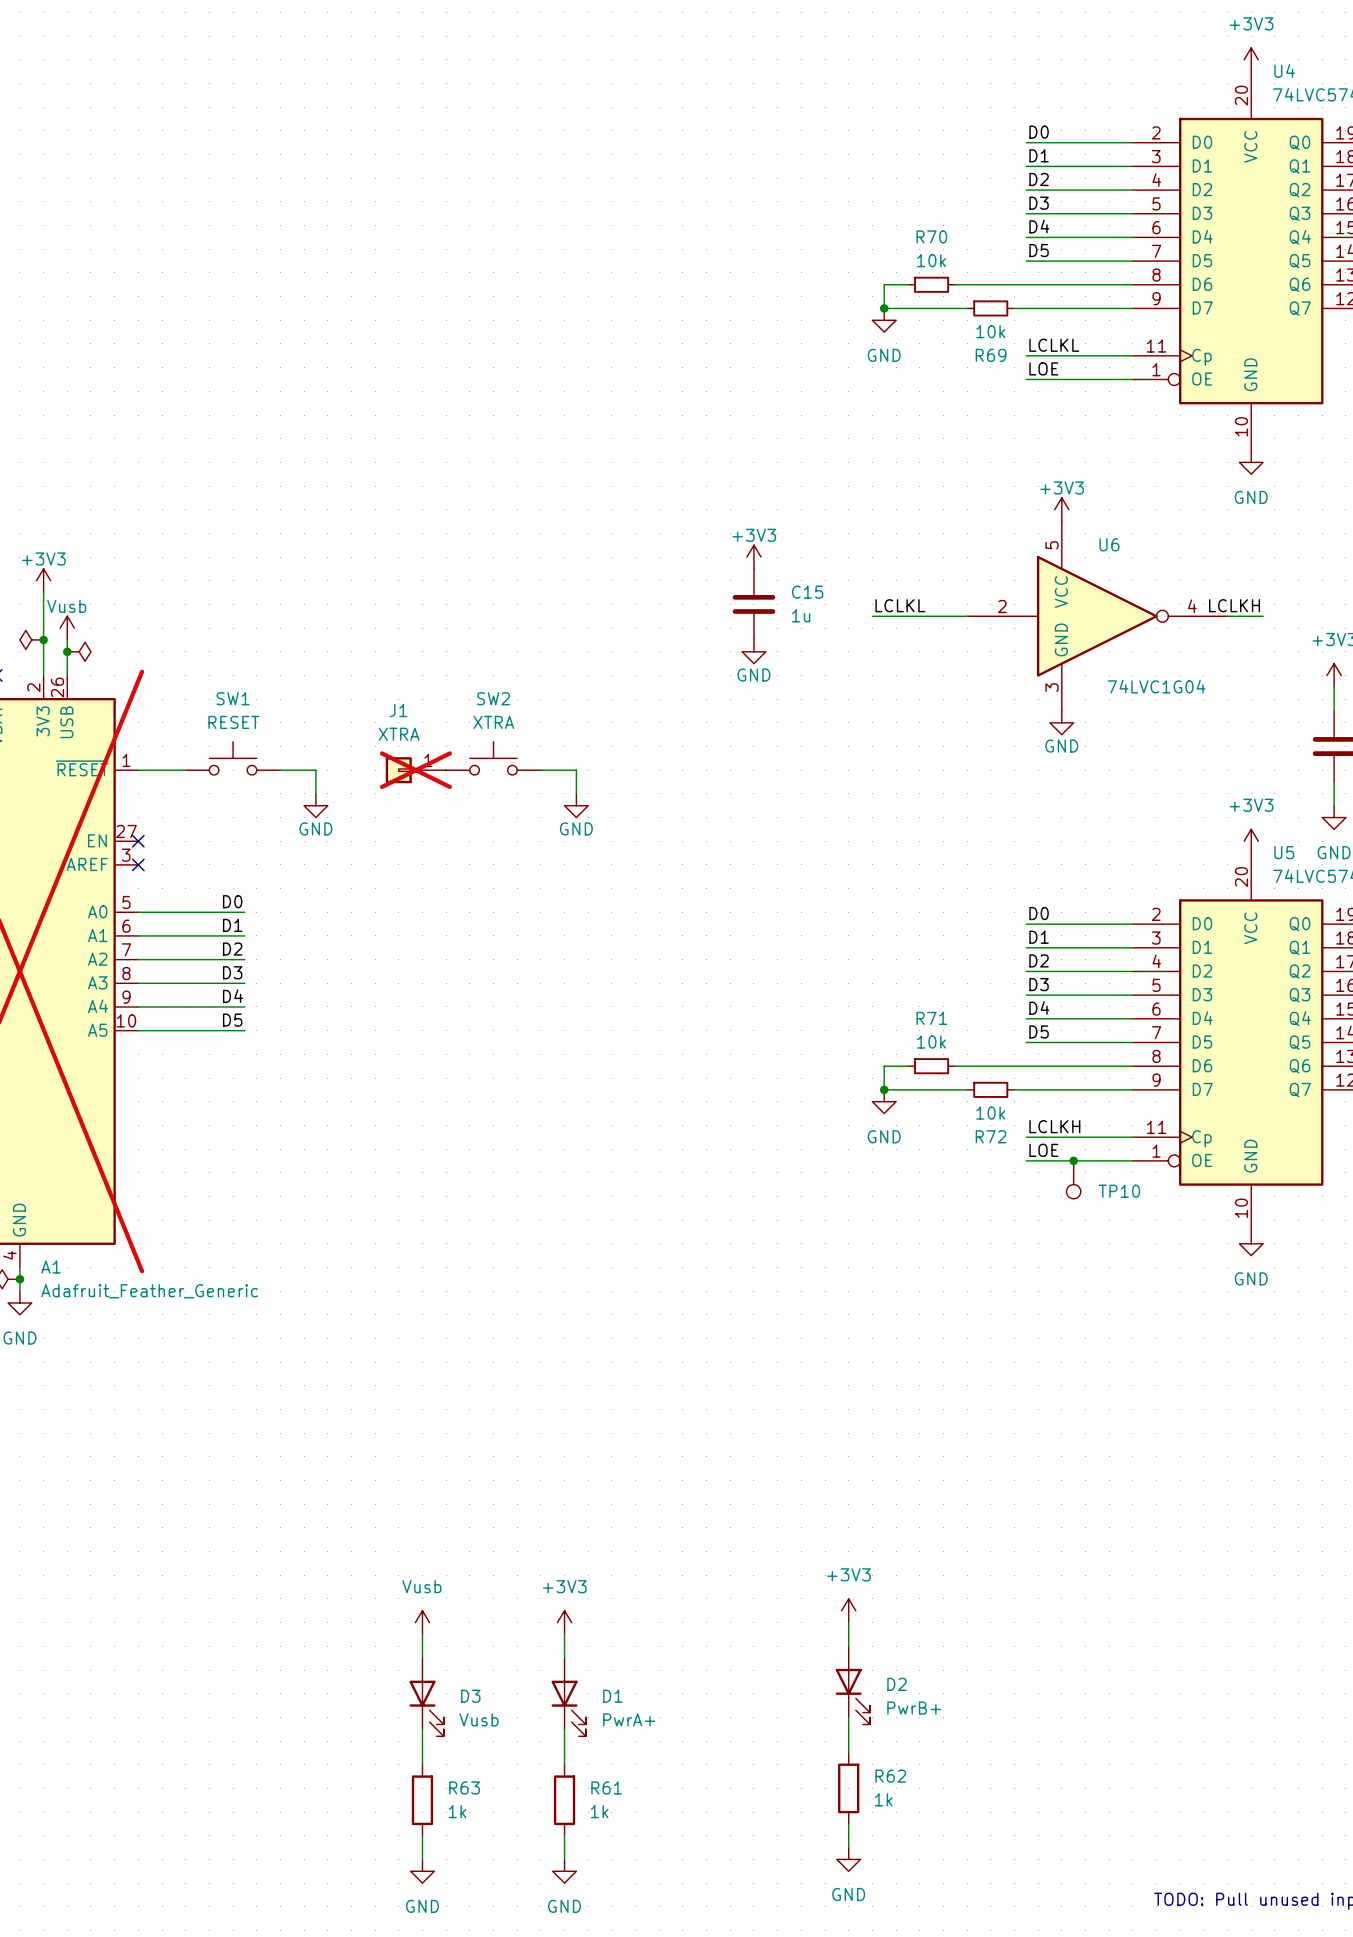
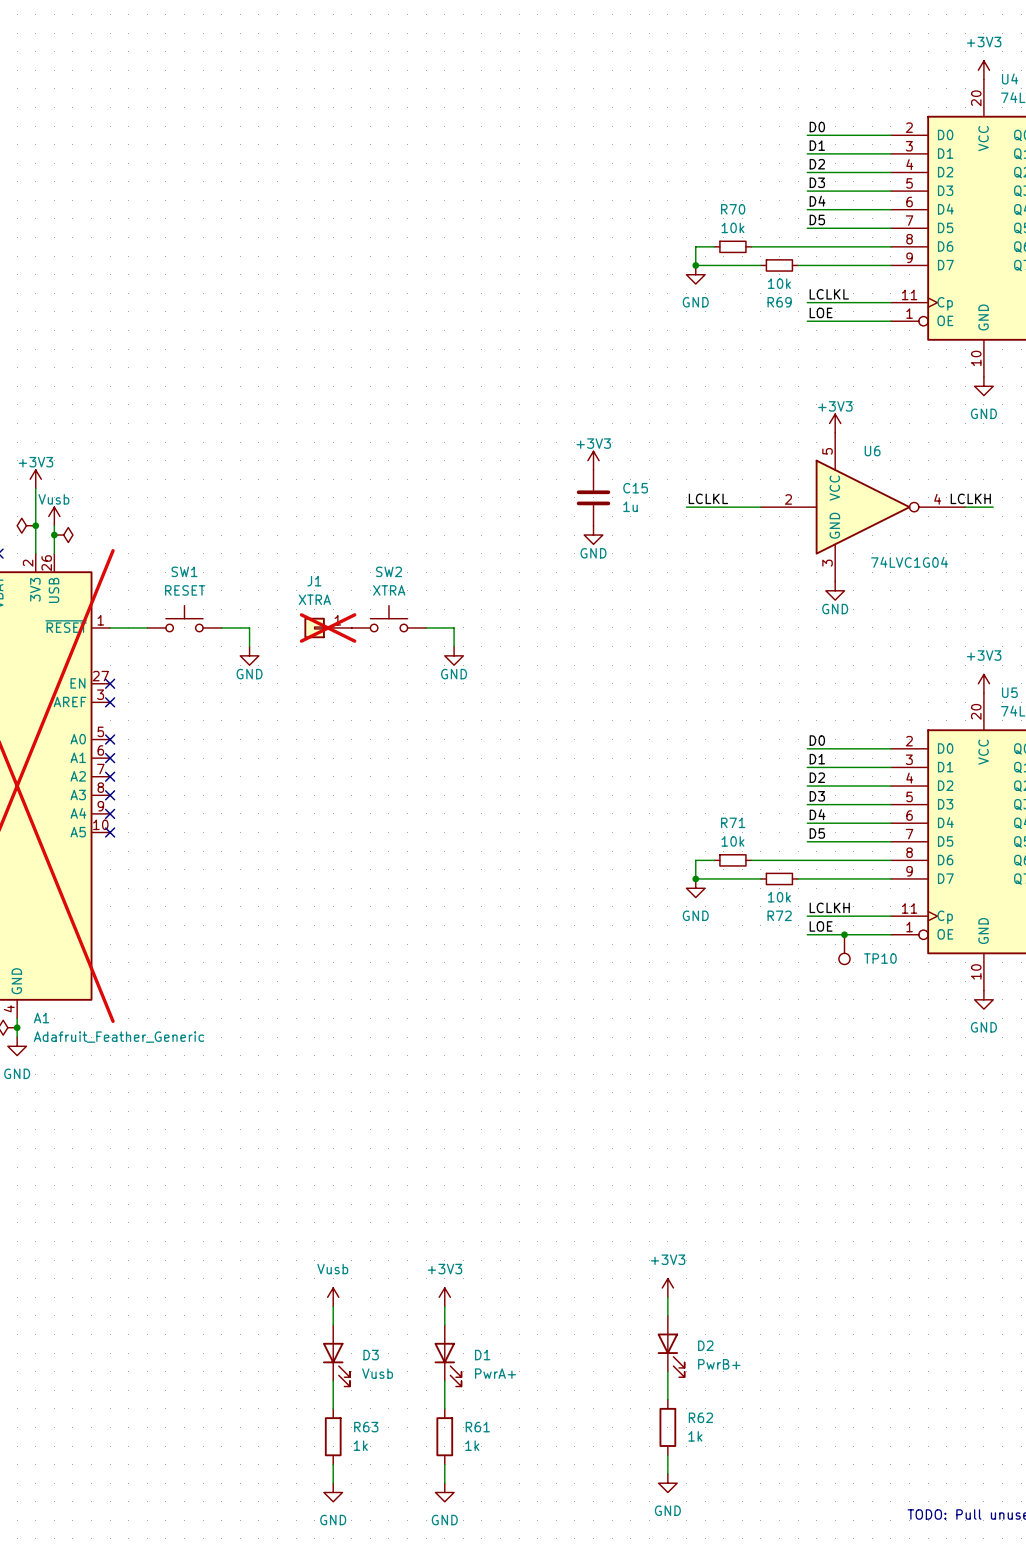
label: D0 (232, 901) -> none
wire: (138, 912) (244, 912) -> none
no-connect mark: none -> (110, 739)
label: D1 (232, 925) -> none
wire: (138, 935) (244, 935) -> none
no-connect mark: none -> (110, 758)
label: D2 (232, 949) -> none
wire: (138, 959) (244, 959) -> none
no-connect mark: none -> (110, 776)
label: D3 (232, 972) -> none
wire: (138, 983) (244, 983) -> none
no-connect mark: none -> (110, 795)
label: D4 (232, 996) -> none
wire: (138, 1006) (244, 1006) -> none
no-connect mark: none -> (110, 813)
label: D5 (232, 1020) -> none
wire: (138, 1030) (244, 1030) -> none
no-connect mark: none -> (110, 832)

